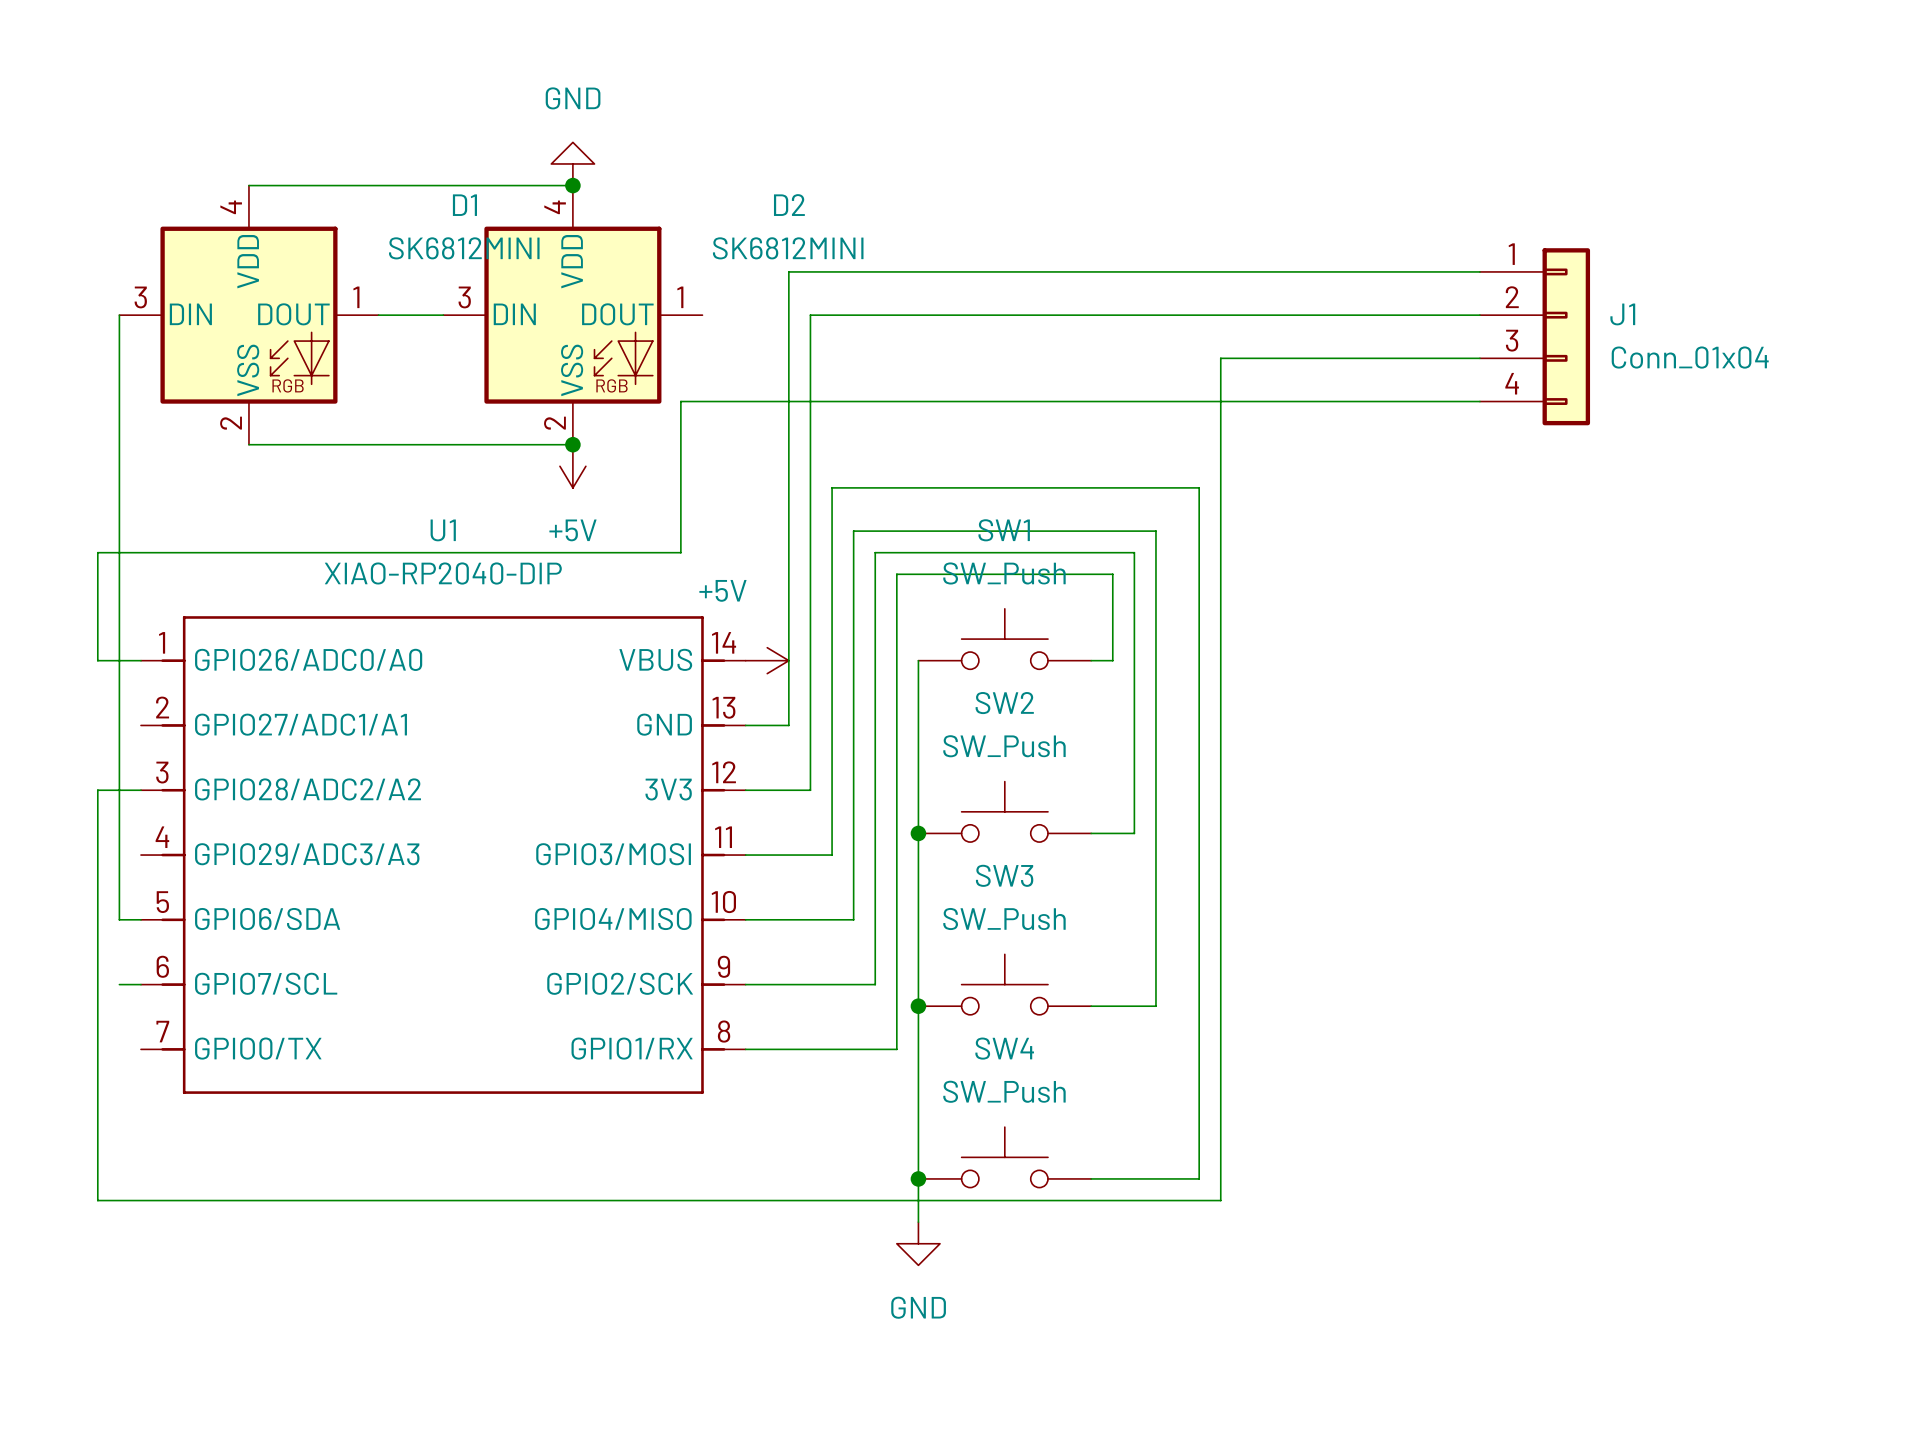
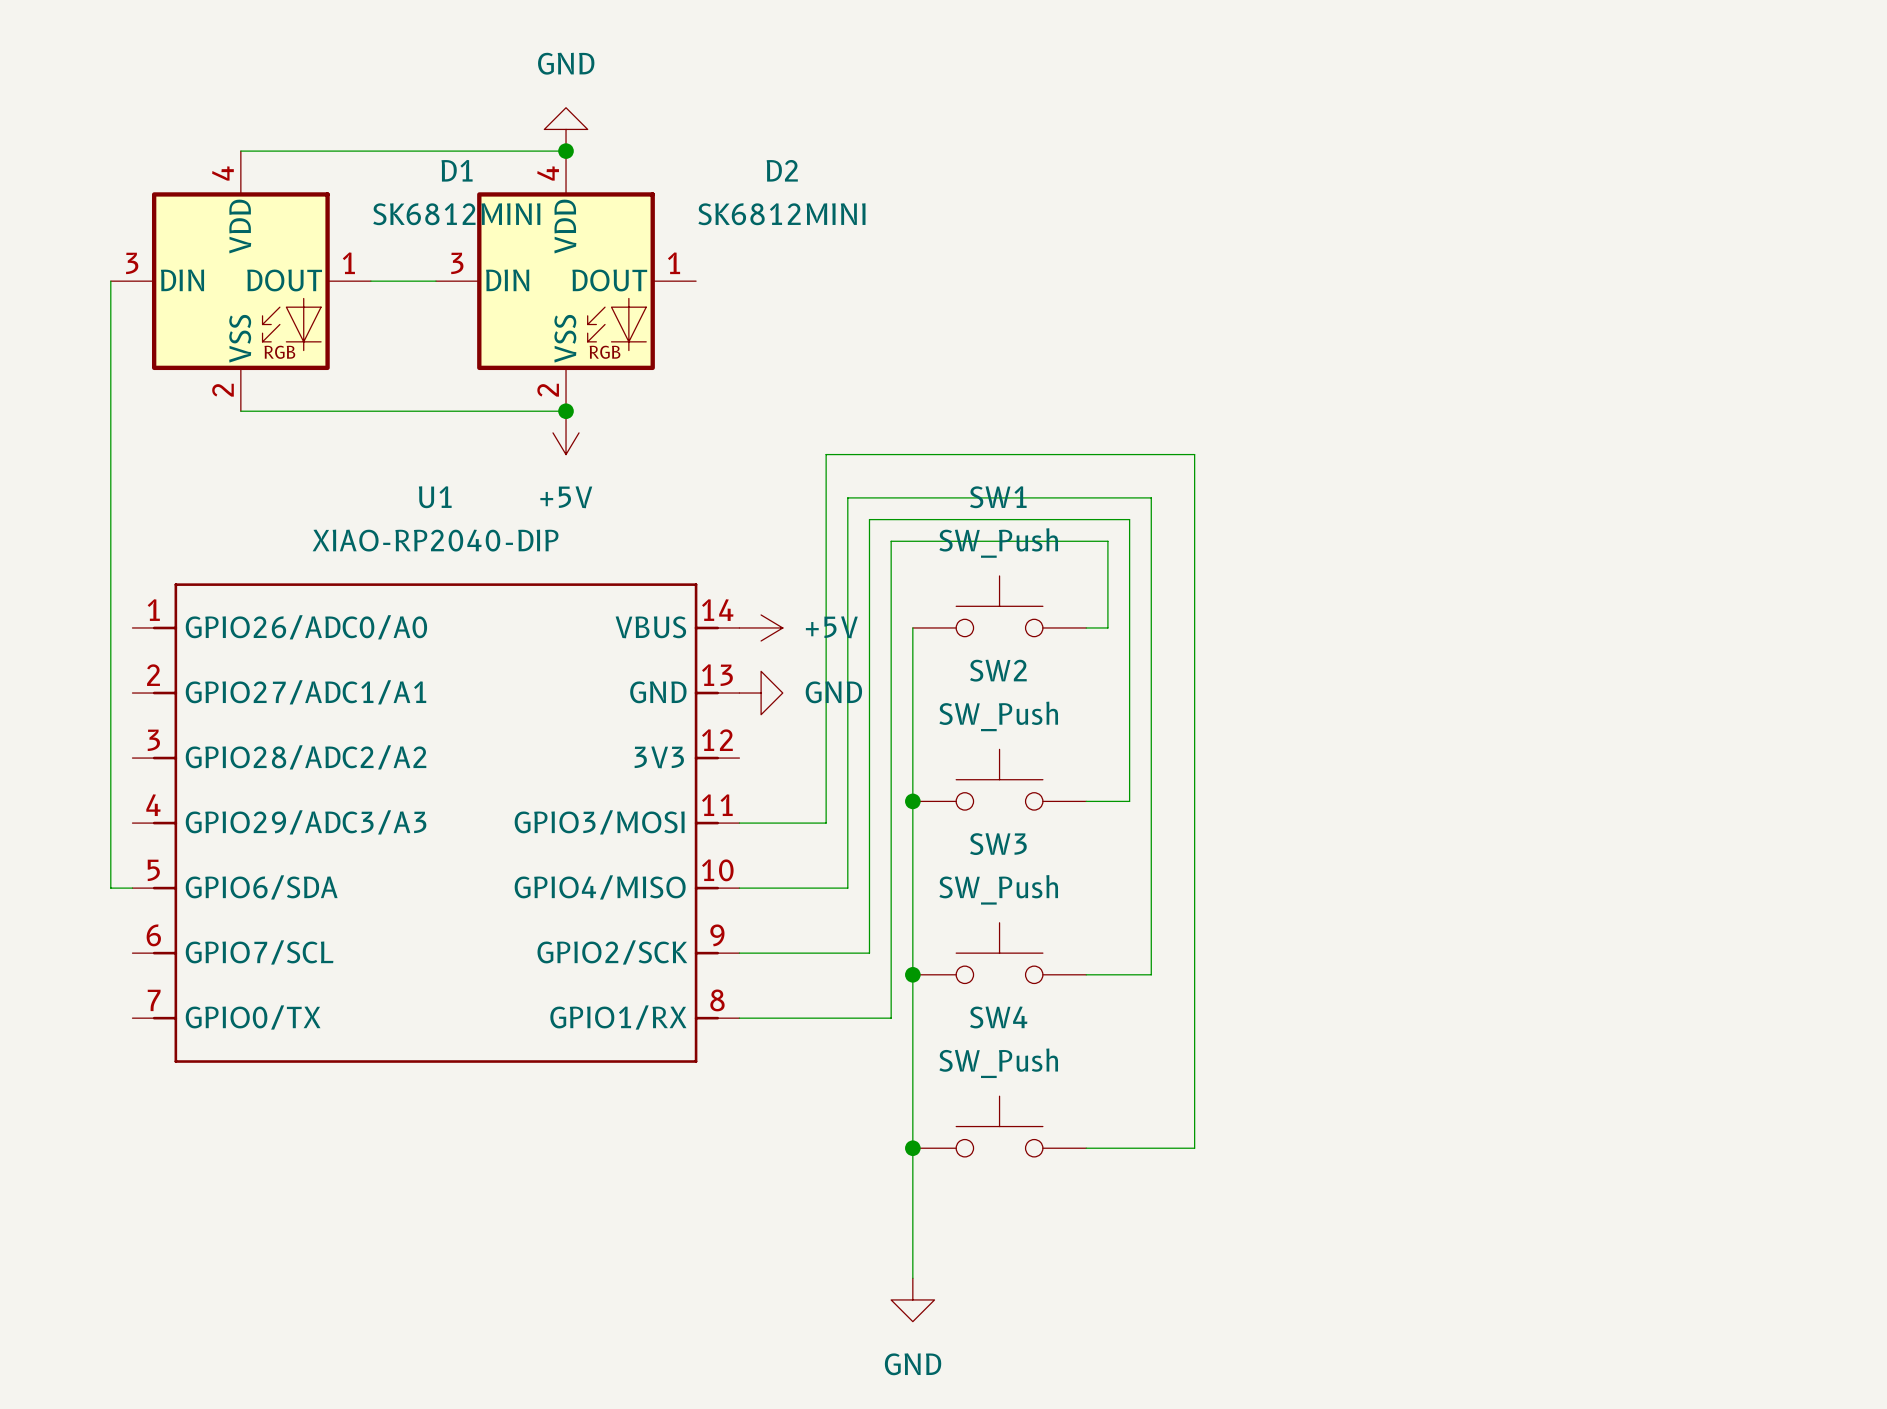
wire: (1479, 271) (788, 271) (788, 725) (745, 725) -> none
wire: (1479, 315) (810, 315) (810, 790) (745, 790) -> none
J1: Conn_01x04 (1534, 336) -> none
wire: (1479, 358) (1220, 358) (1220, 1200) (97, 1200) (97, 790) (141, 790) -> none
wire: (1479, 401) (680, 401) (680, 552) (97, 552) (97, 660) (141, 660) -> none
power symbol text position: +5V (722, 590) -> +5V (831, 627)
power symbol: none -> GND (761, 693)
wire: (119, 984) (141, 984) -> none
wire: none -> (912, 1191) (912, 1278)
power symbol position: GND (918, 1243) -> GND (912, 1299)

